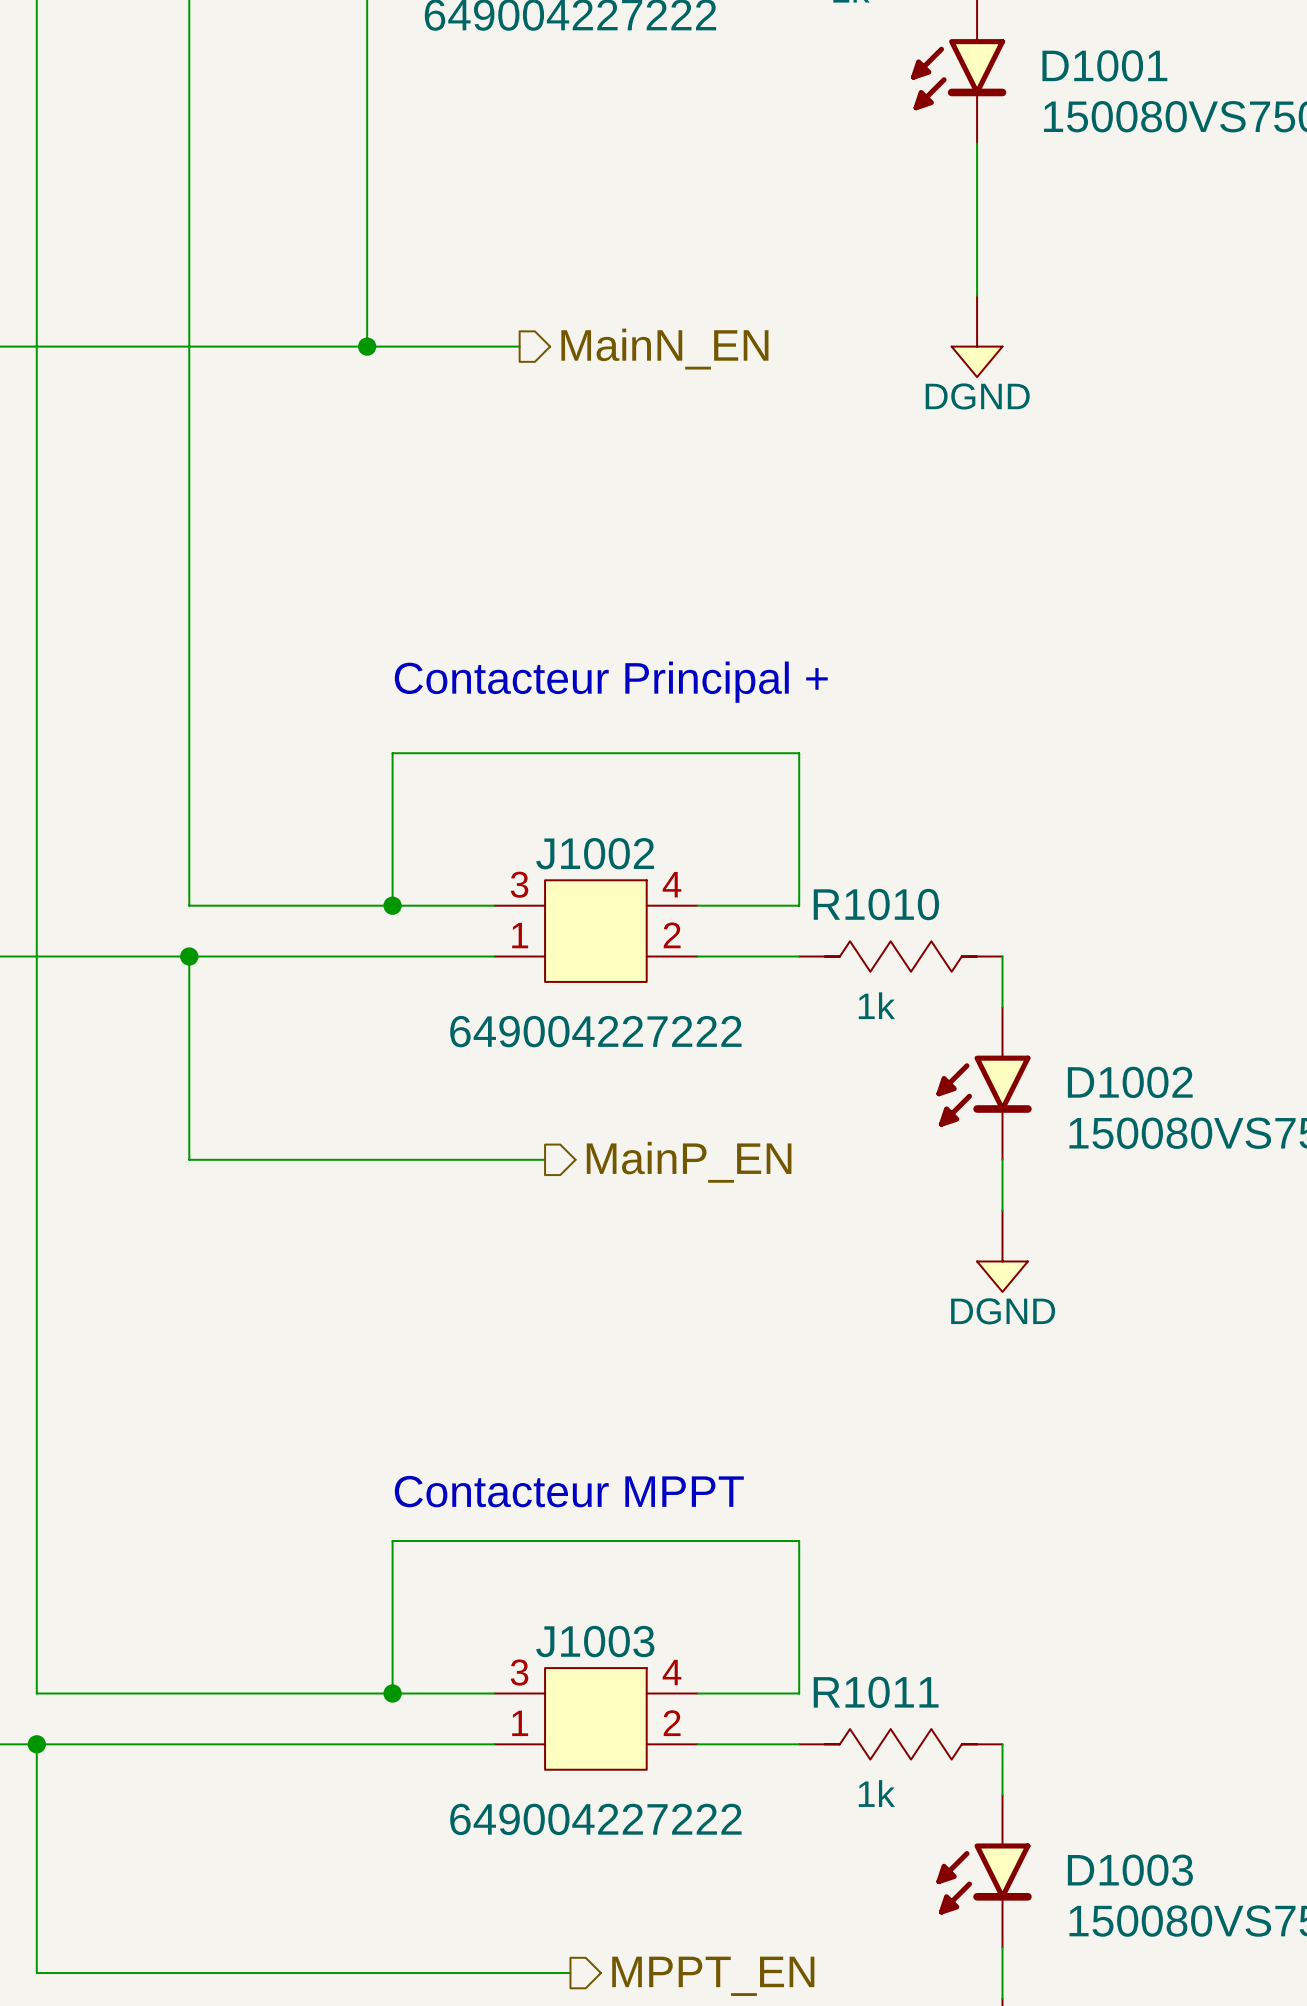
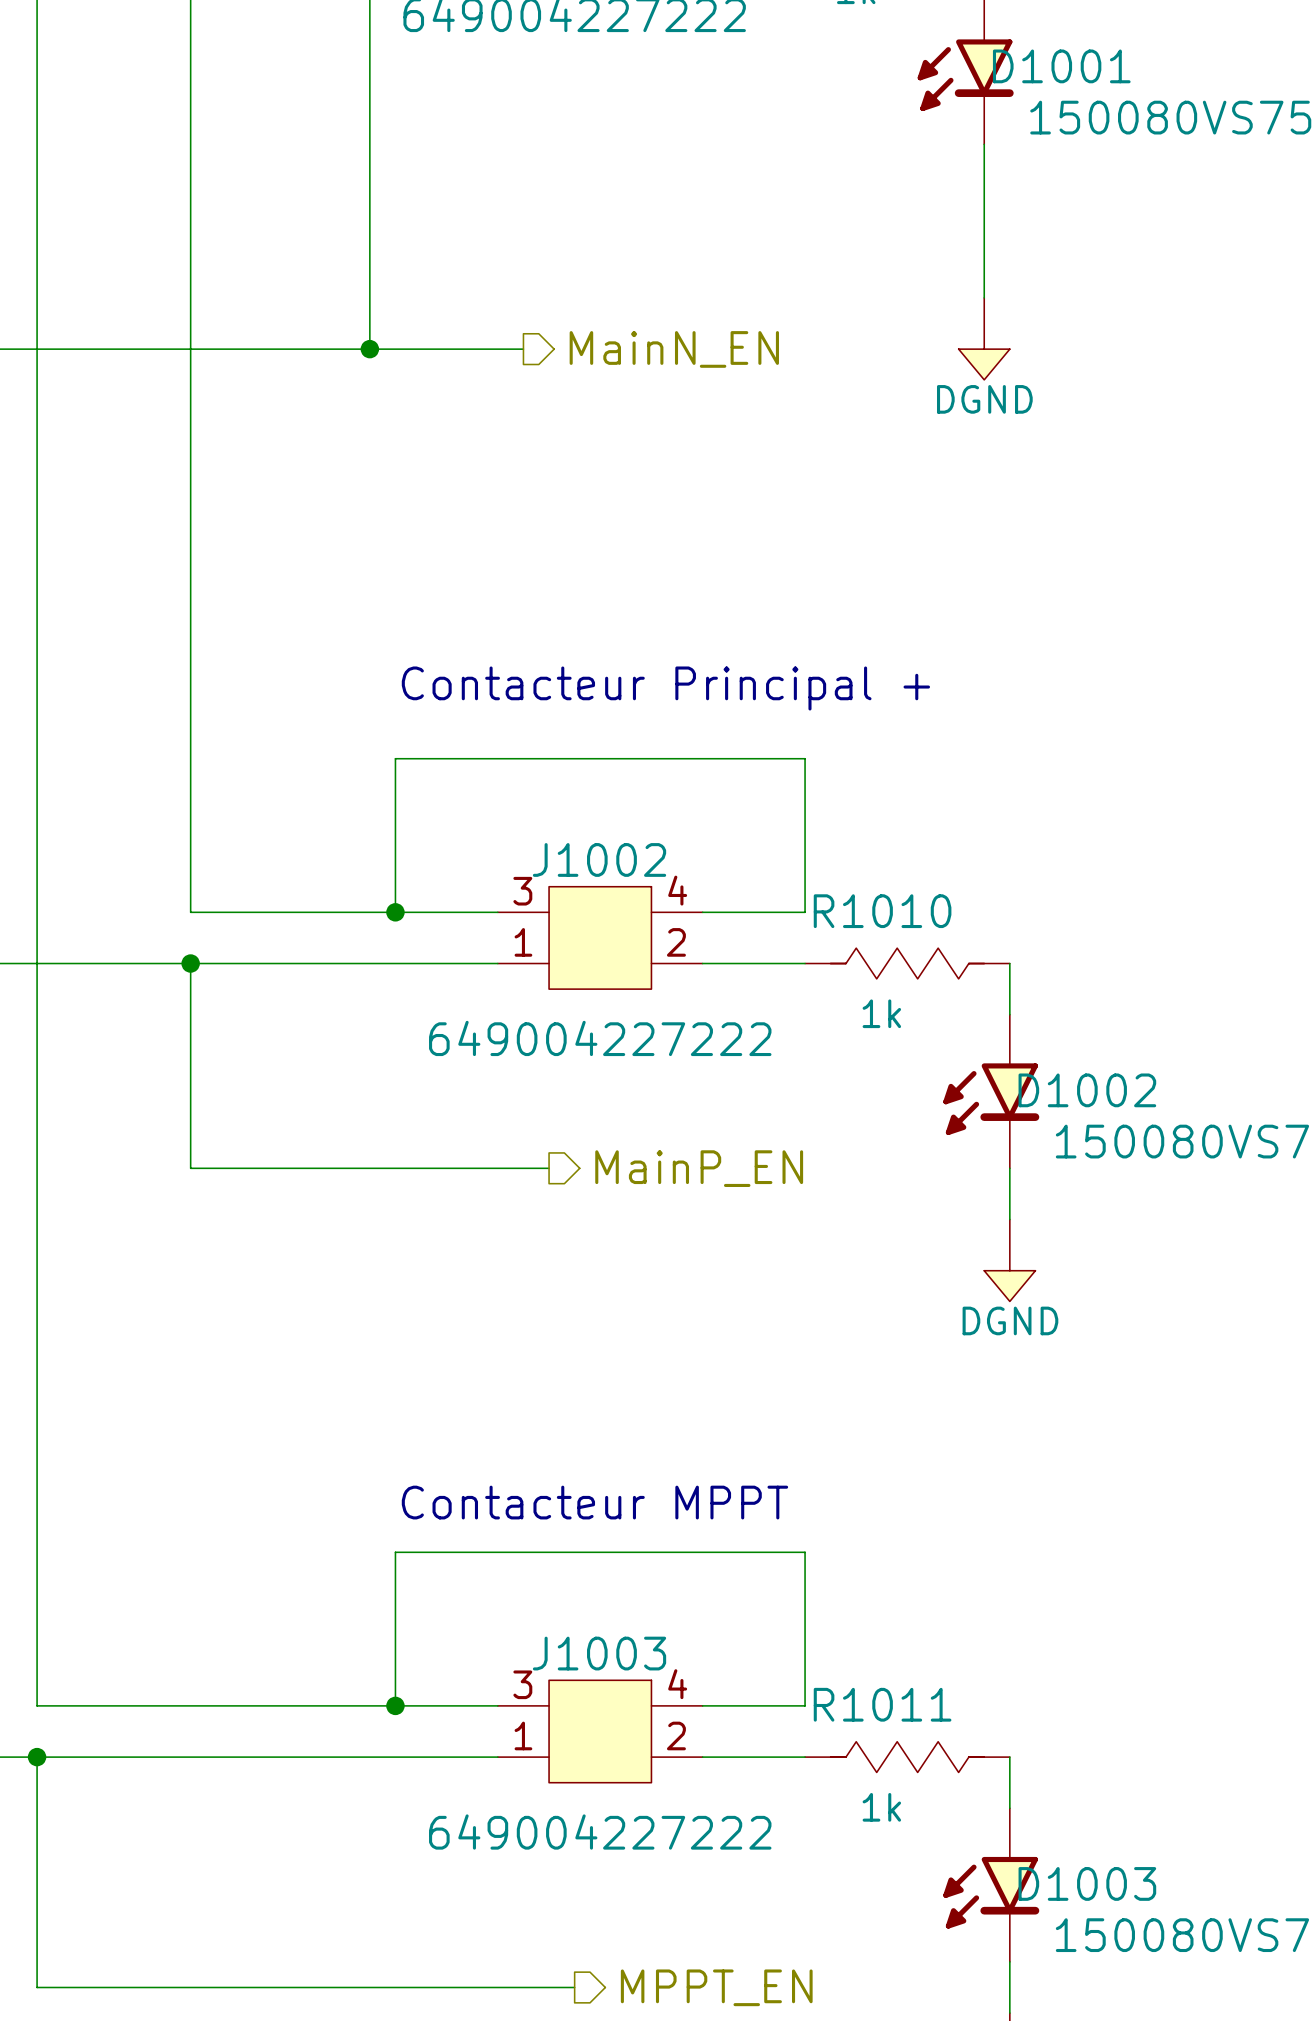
D1001 name position: D1001 (1104, 65) -> D1001 (1061, 66)
D1002 name position: D1002 (1130, 1082) -> D1002 (1087, 1090)
D1003 name position: D1003 (1130, 1870) -> D1003 (1087, 1883)

